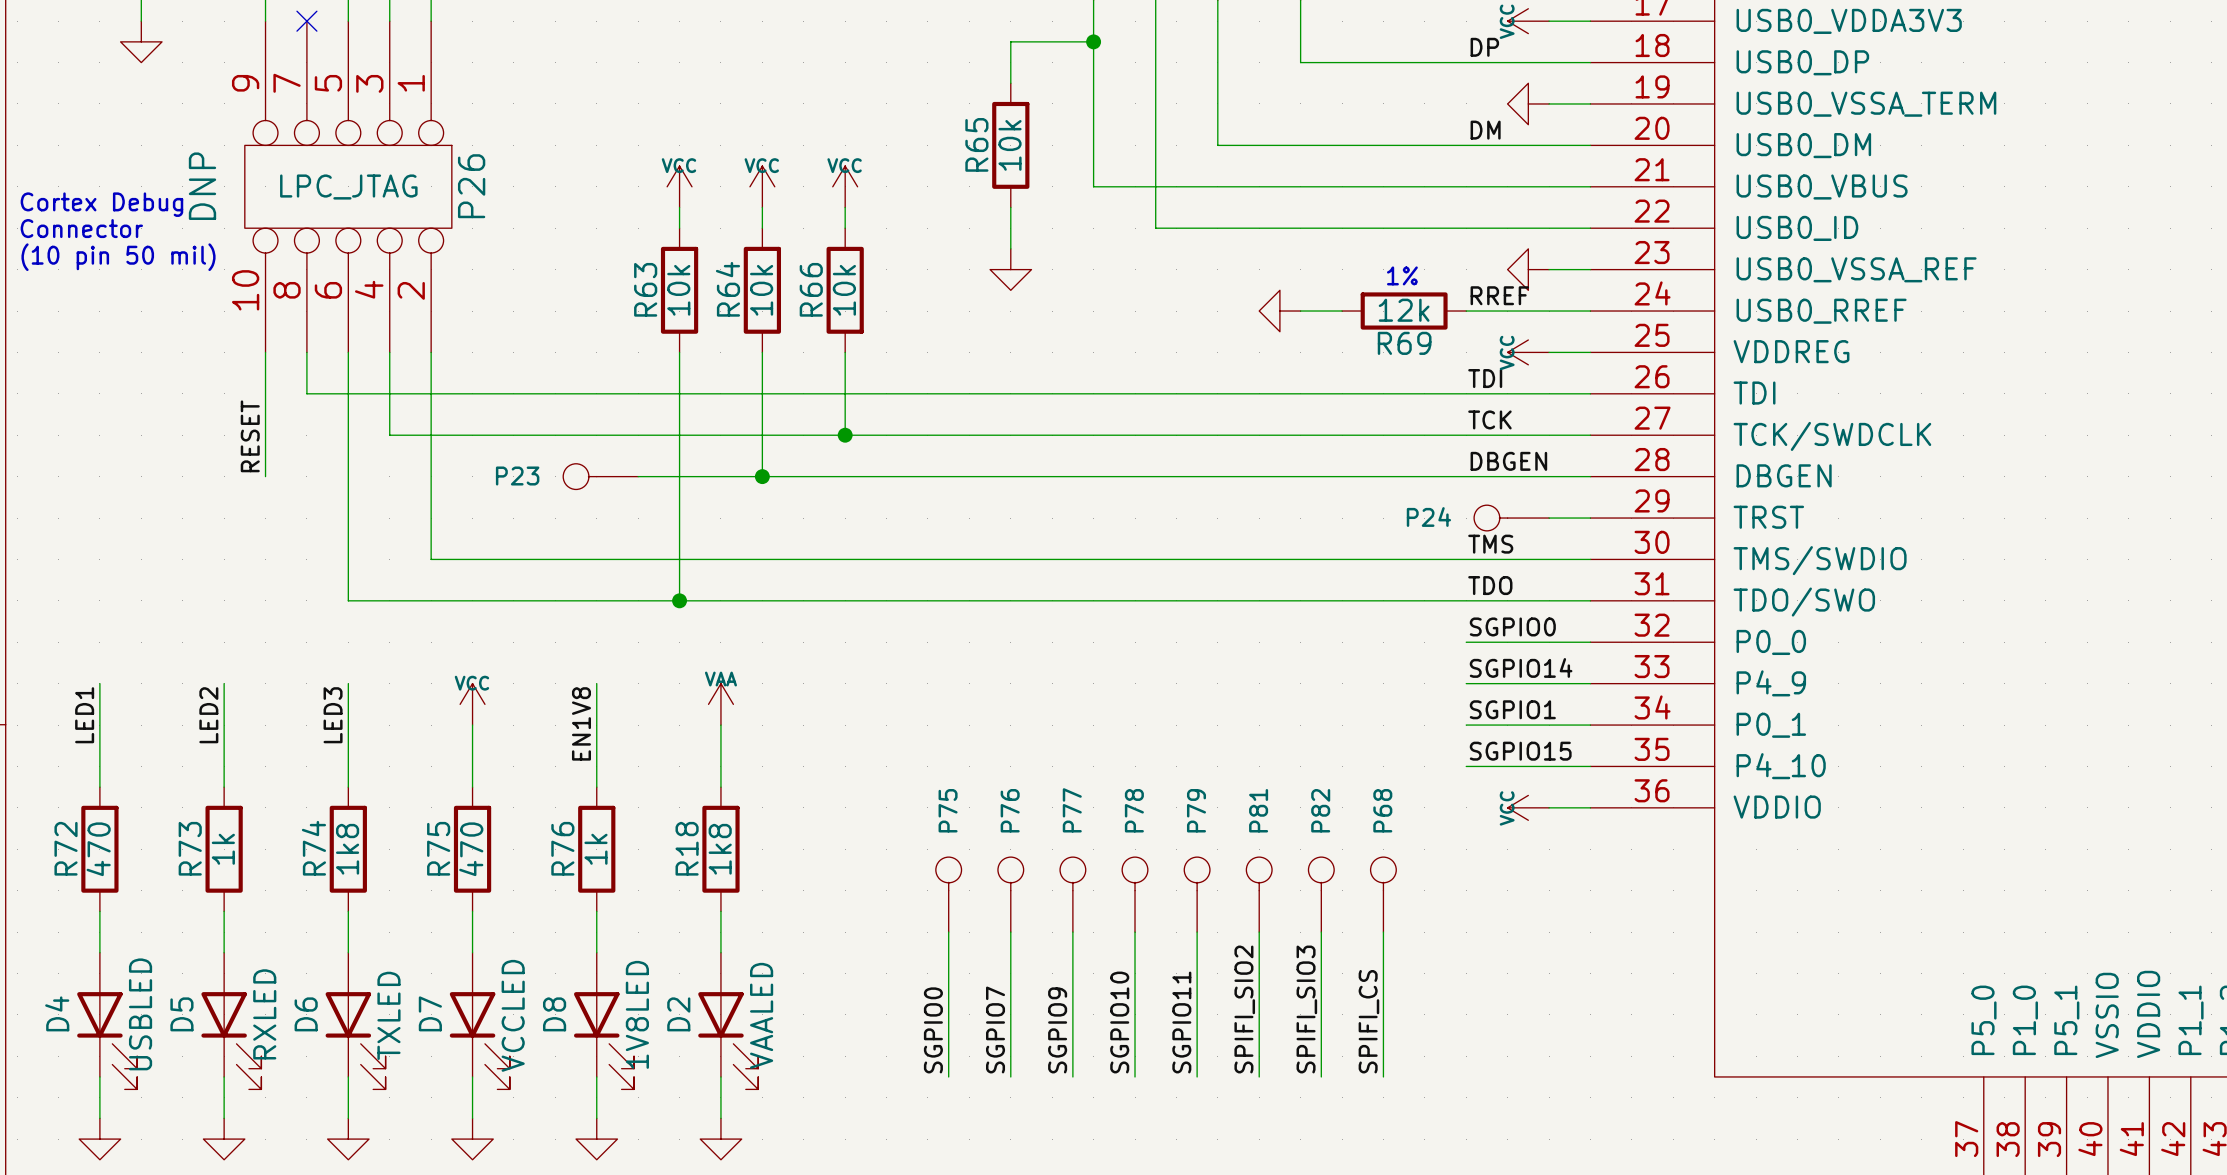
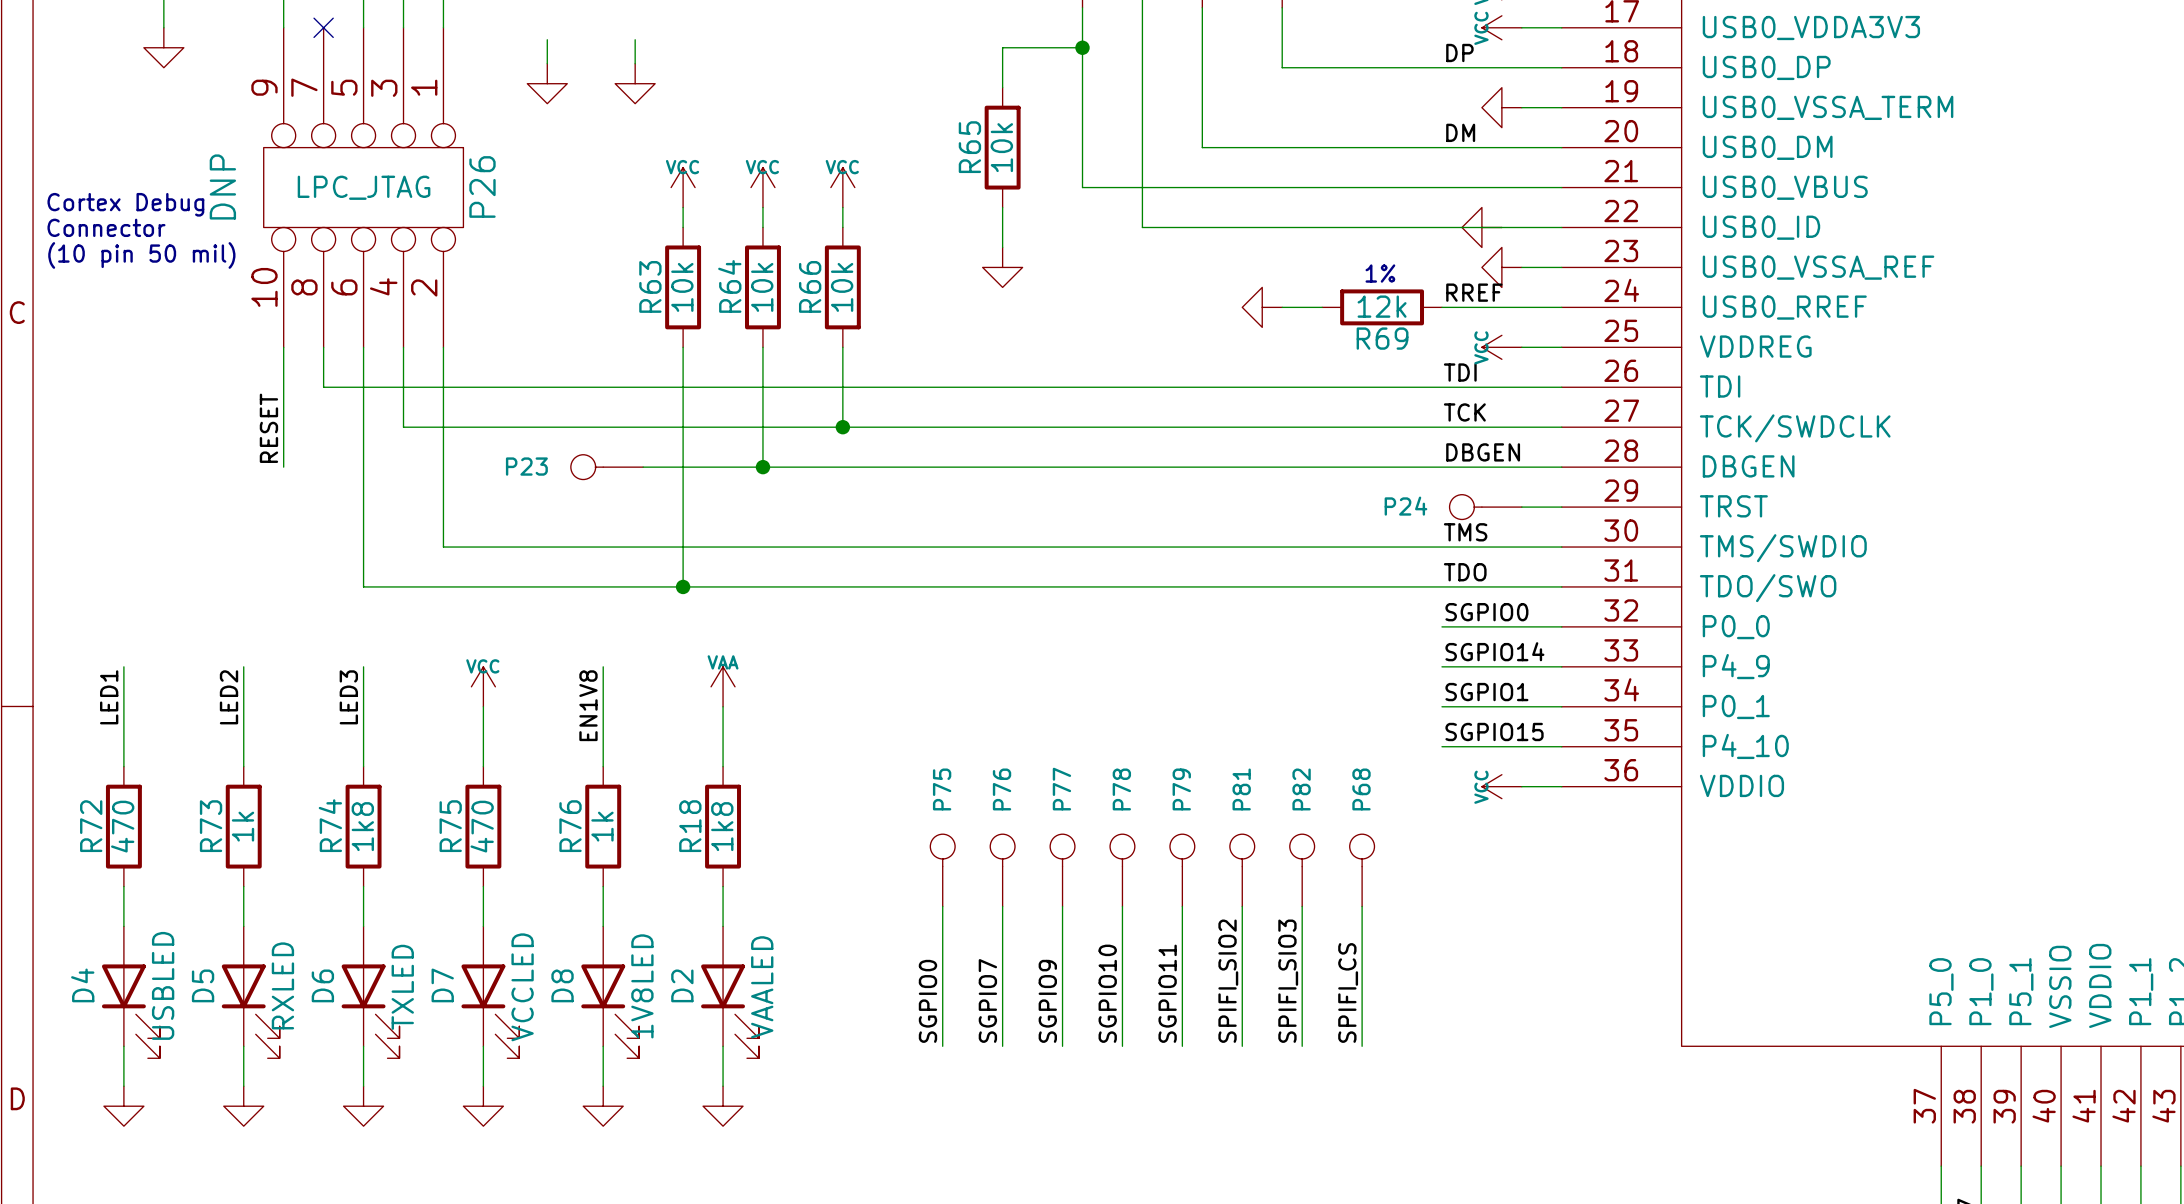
wire: none -> (547, 39) (547, 63)
wire: none -> (635, 39) (635, 63)
power symbol: none -> (547, 83)
power symbol: none -> (635, 83)
power symbol: none -> (1481, 227)

